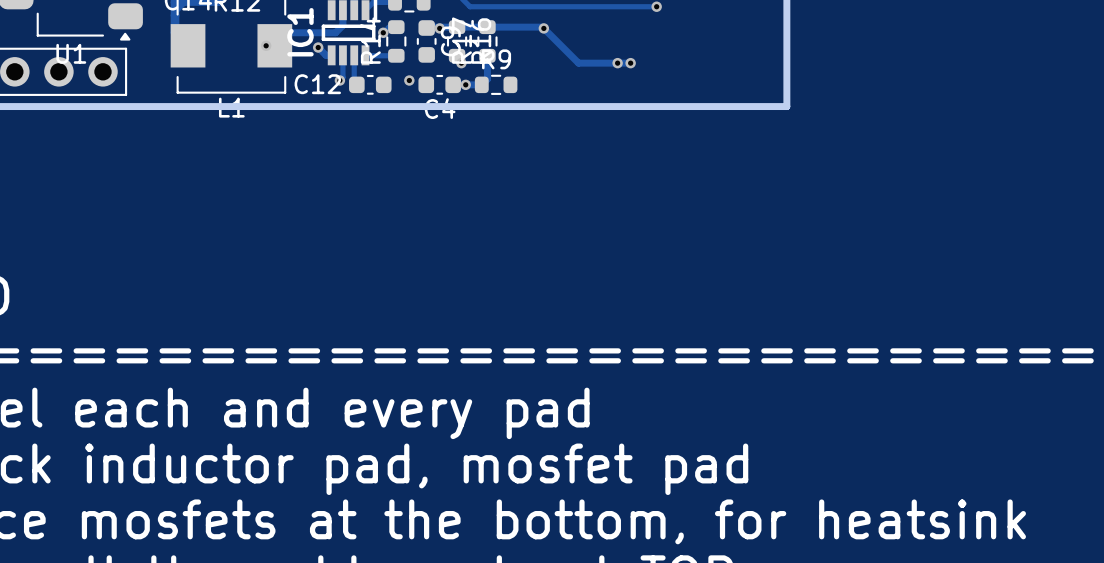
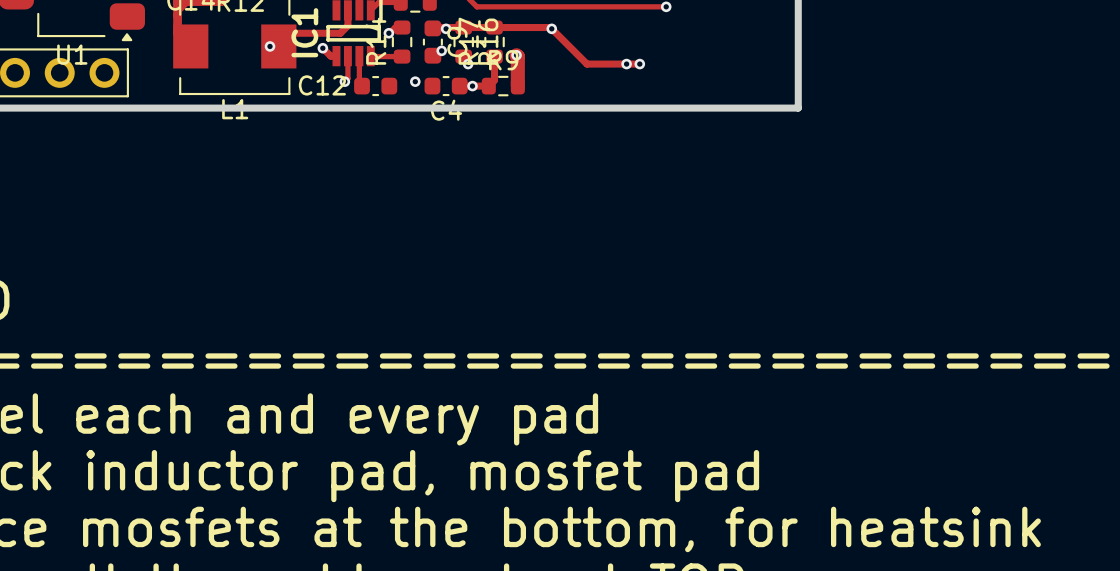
via: none -> (441, 50)
track: none -> (516, 55) (517, 86)
via: none -> (516, 55)

